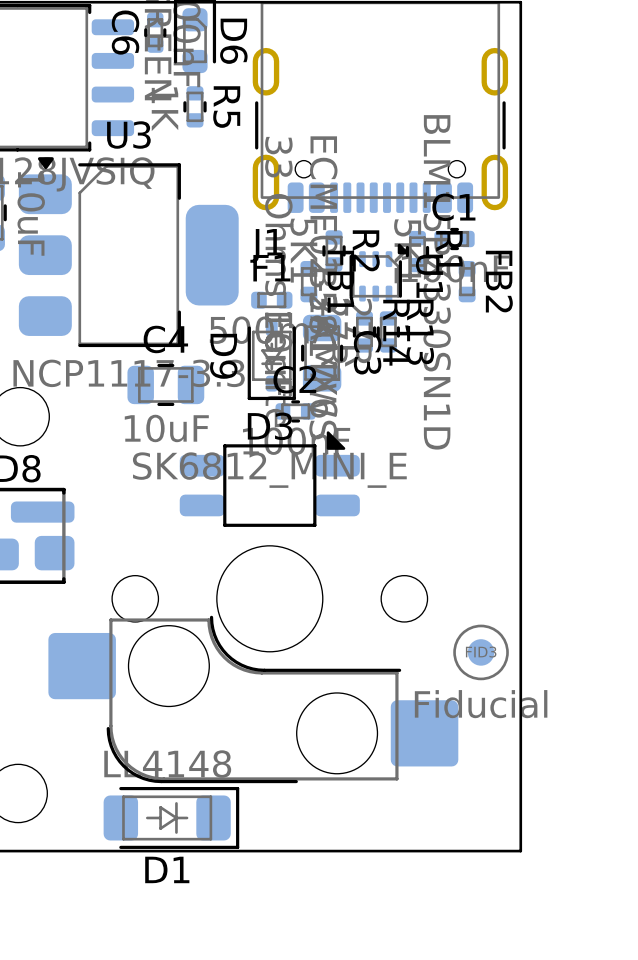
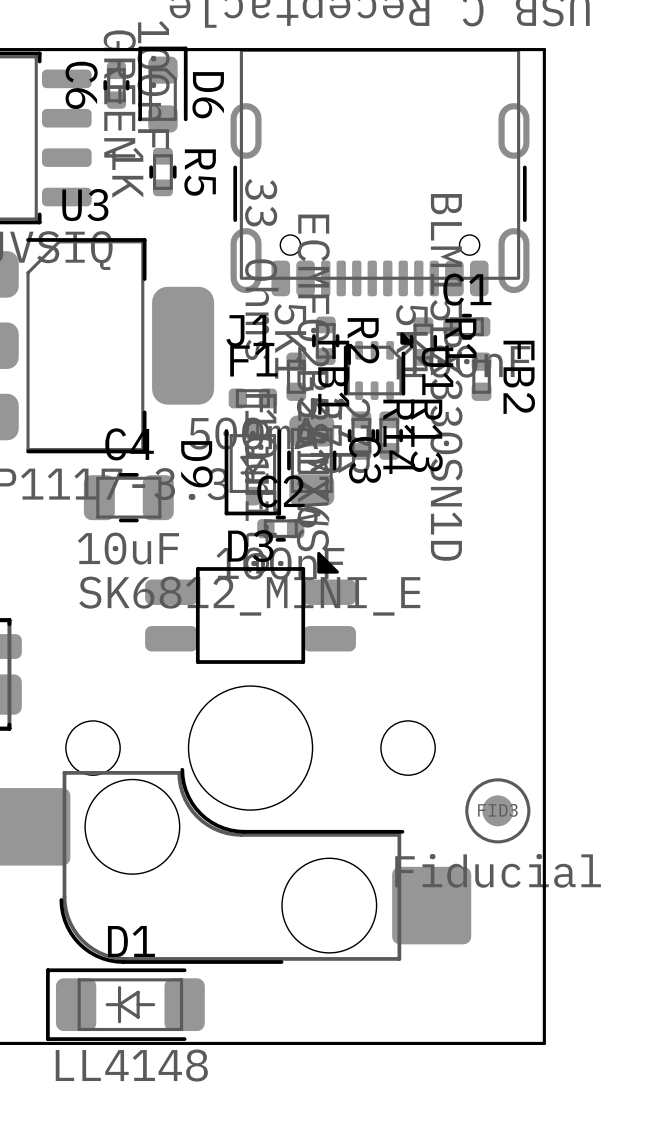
D1 rotation: 0° (171, 817) -> 180° (125, 1004)

